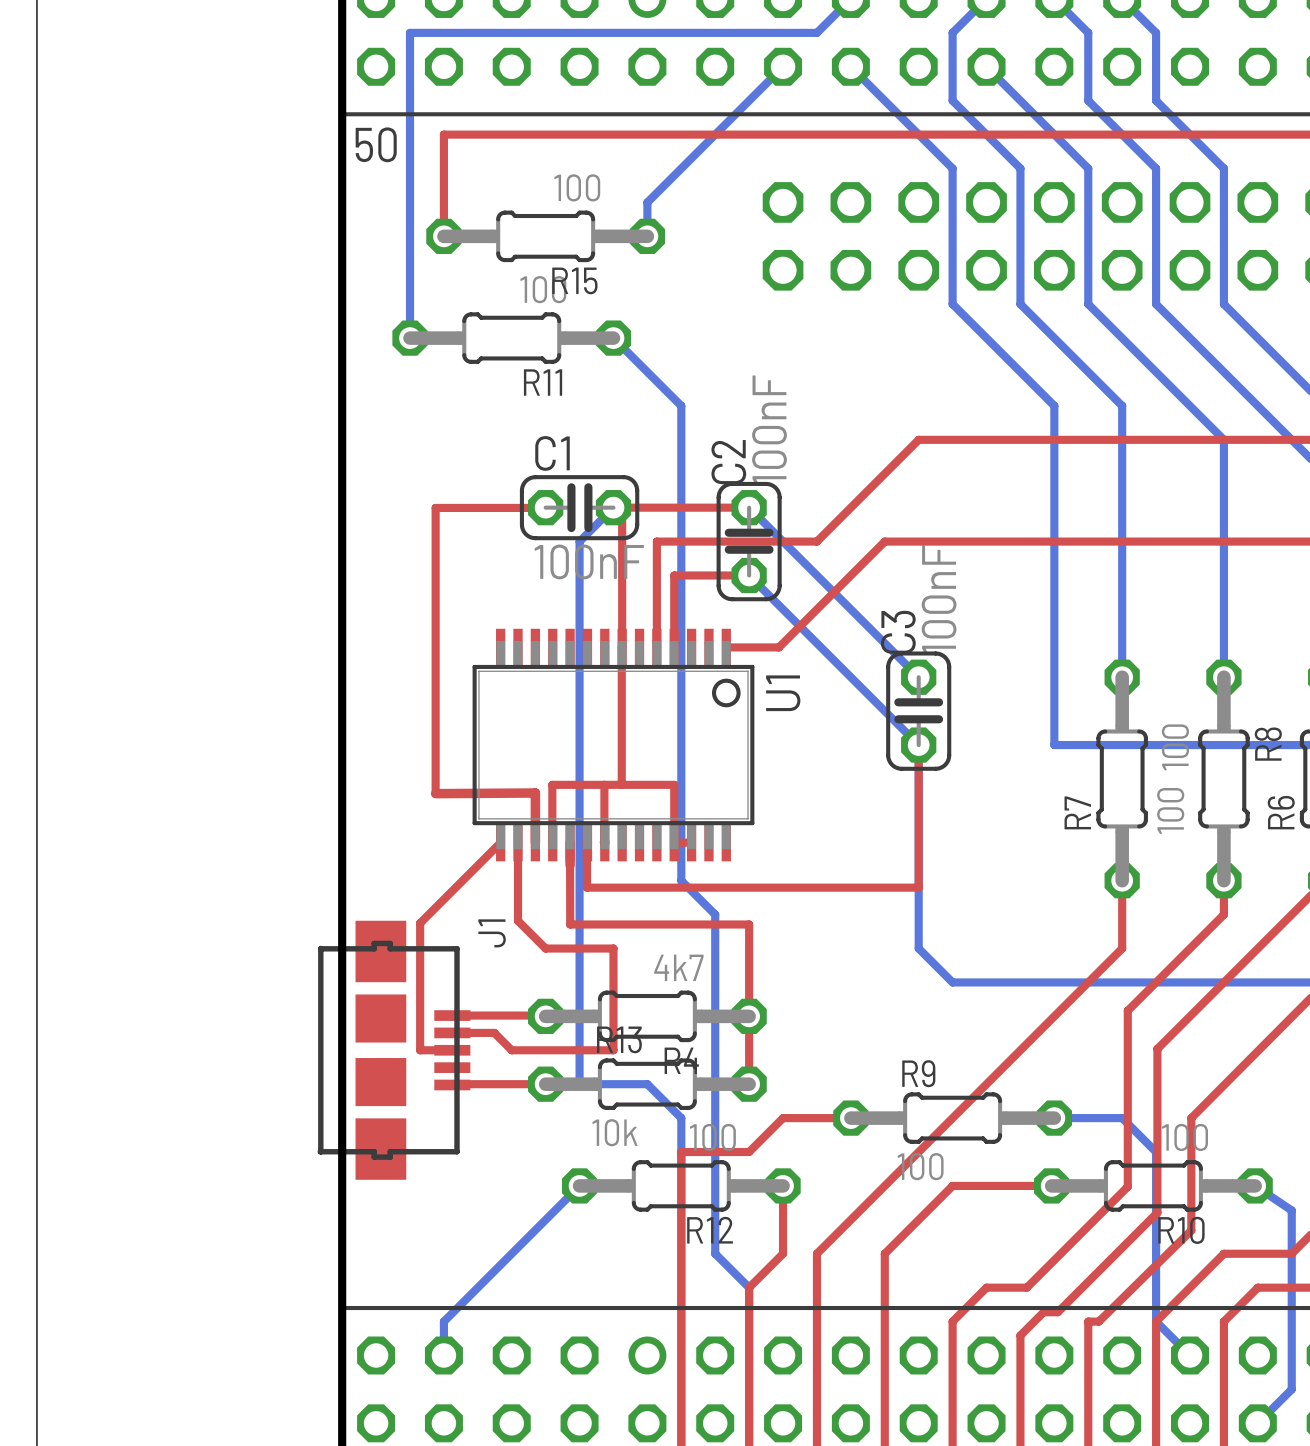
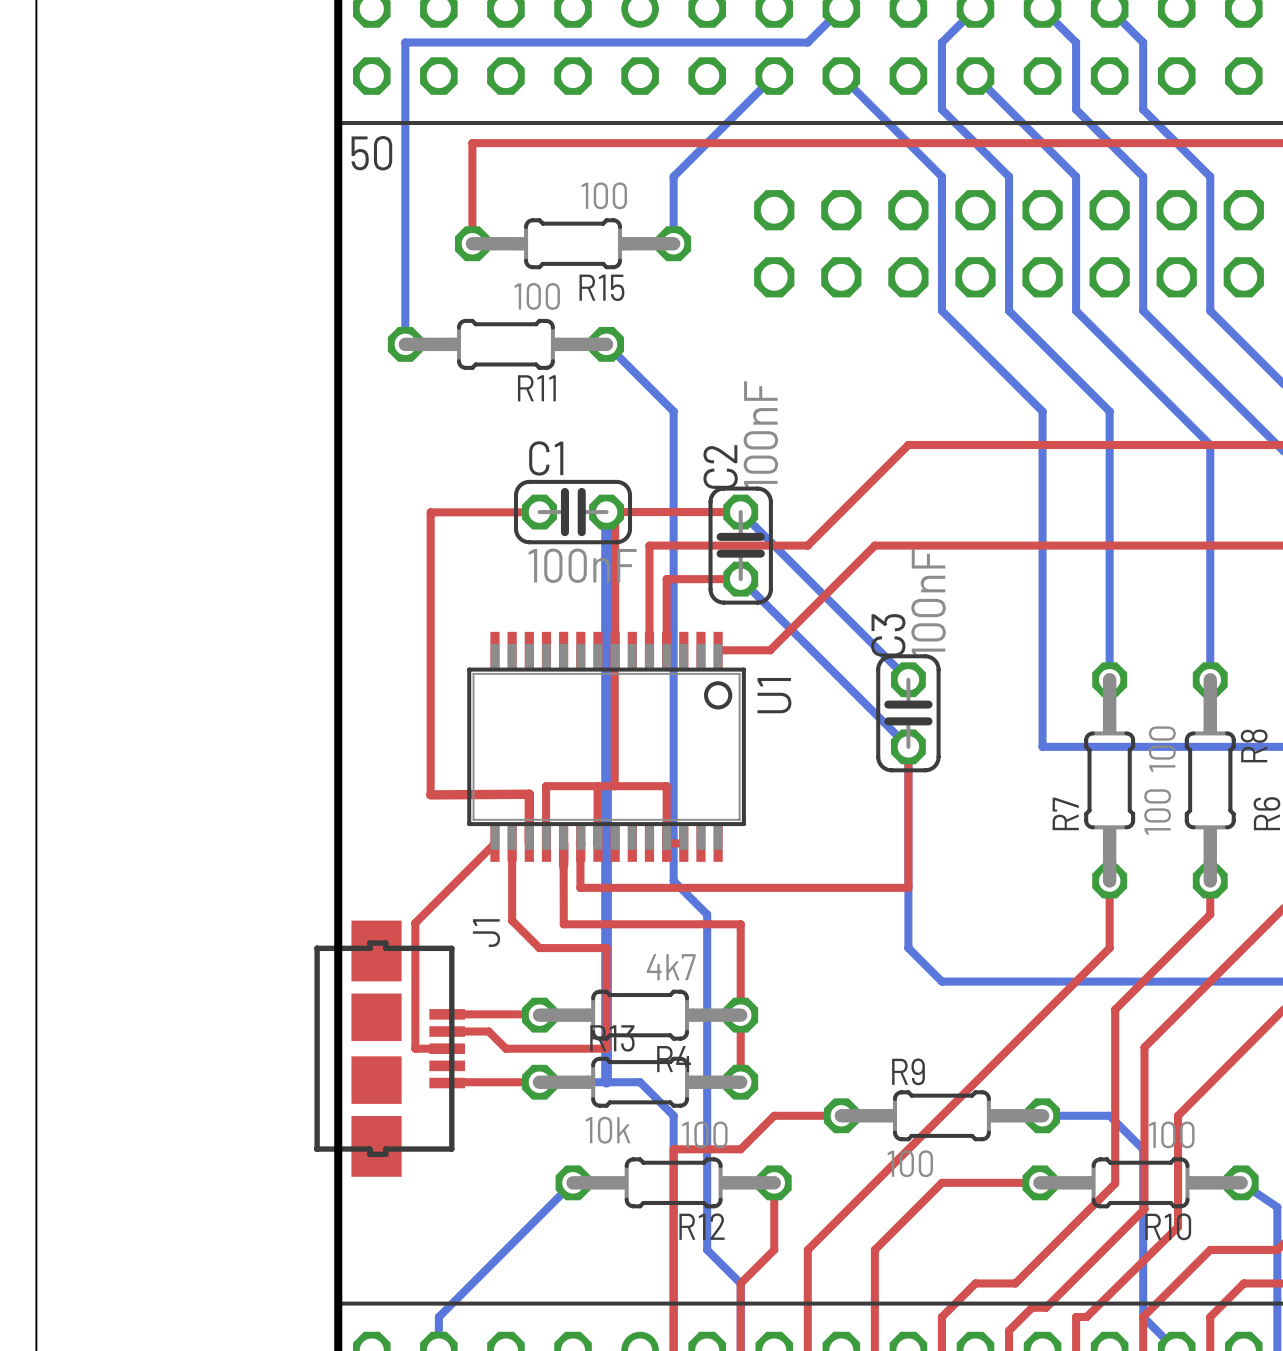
top track: (477, 134) (443, 134) (443, 236) -> (472, 143) (472, 243)
bottom track: (681, 168) (647, 202) (647, 236) -> (673, 176) (673, 243)
R15 position: (545, 236) -> (573, 243)
bottom track: (613, 507) (579, 541) (579, 1084) -> (606, 512) (606, 1082)

